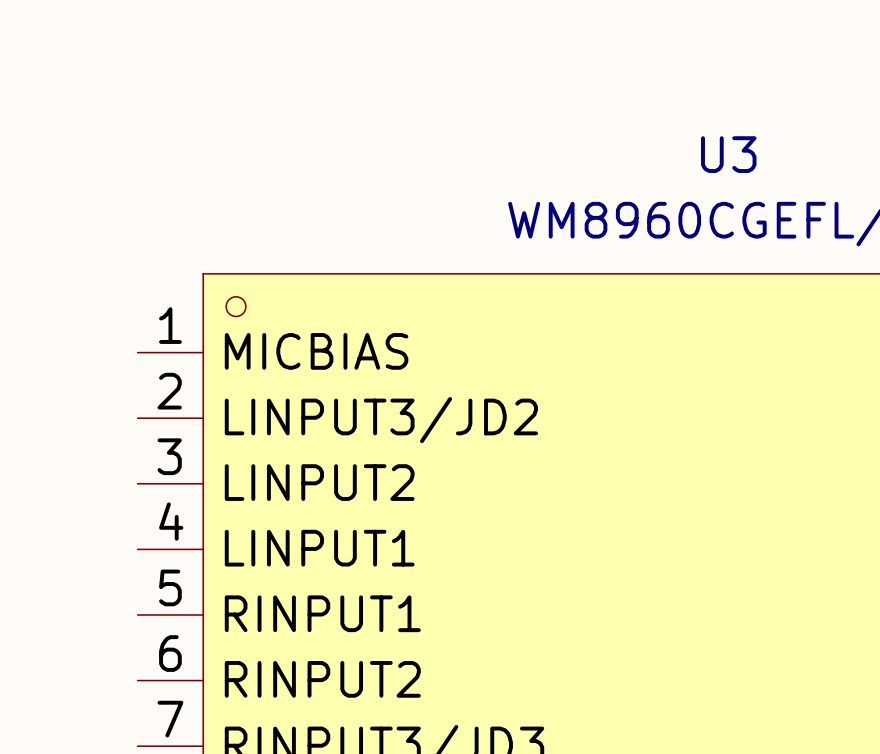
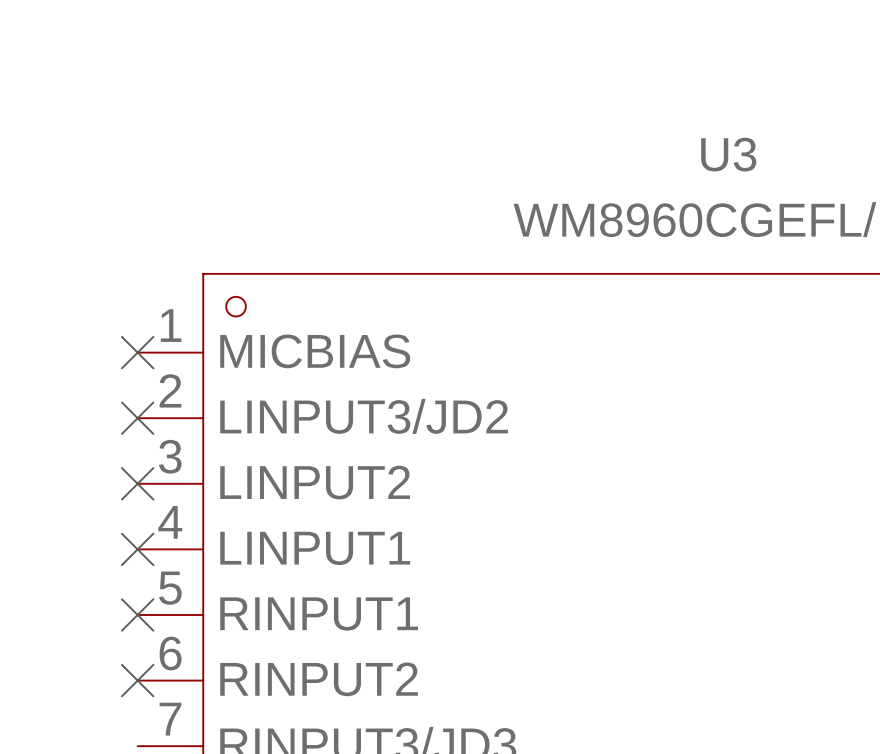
no-connect mark: none -> (137, 352)
no-connect mark: none -> (137, 418)
no-connect mark: none -> (137, 483)
no-connect mark: none -> (137, 549)
no-connect mark: none -> (137, 614)
no-connect mark: none -> (137, 680)

